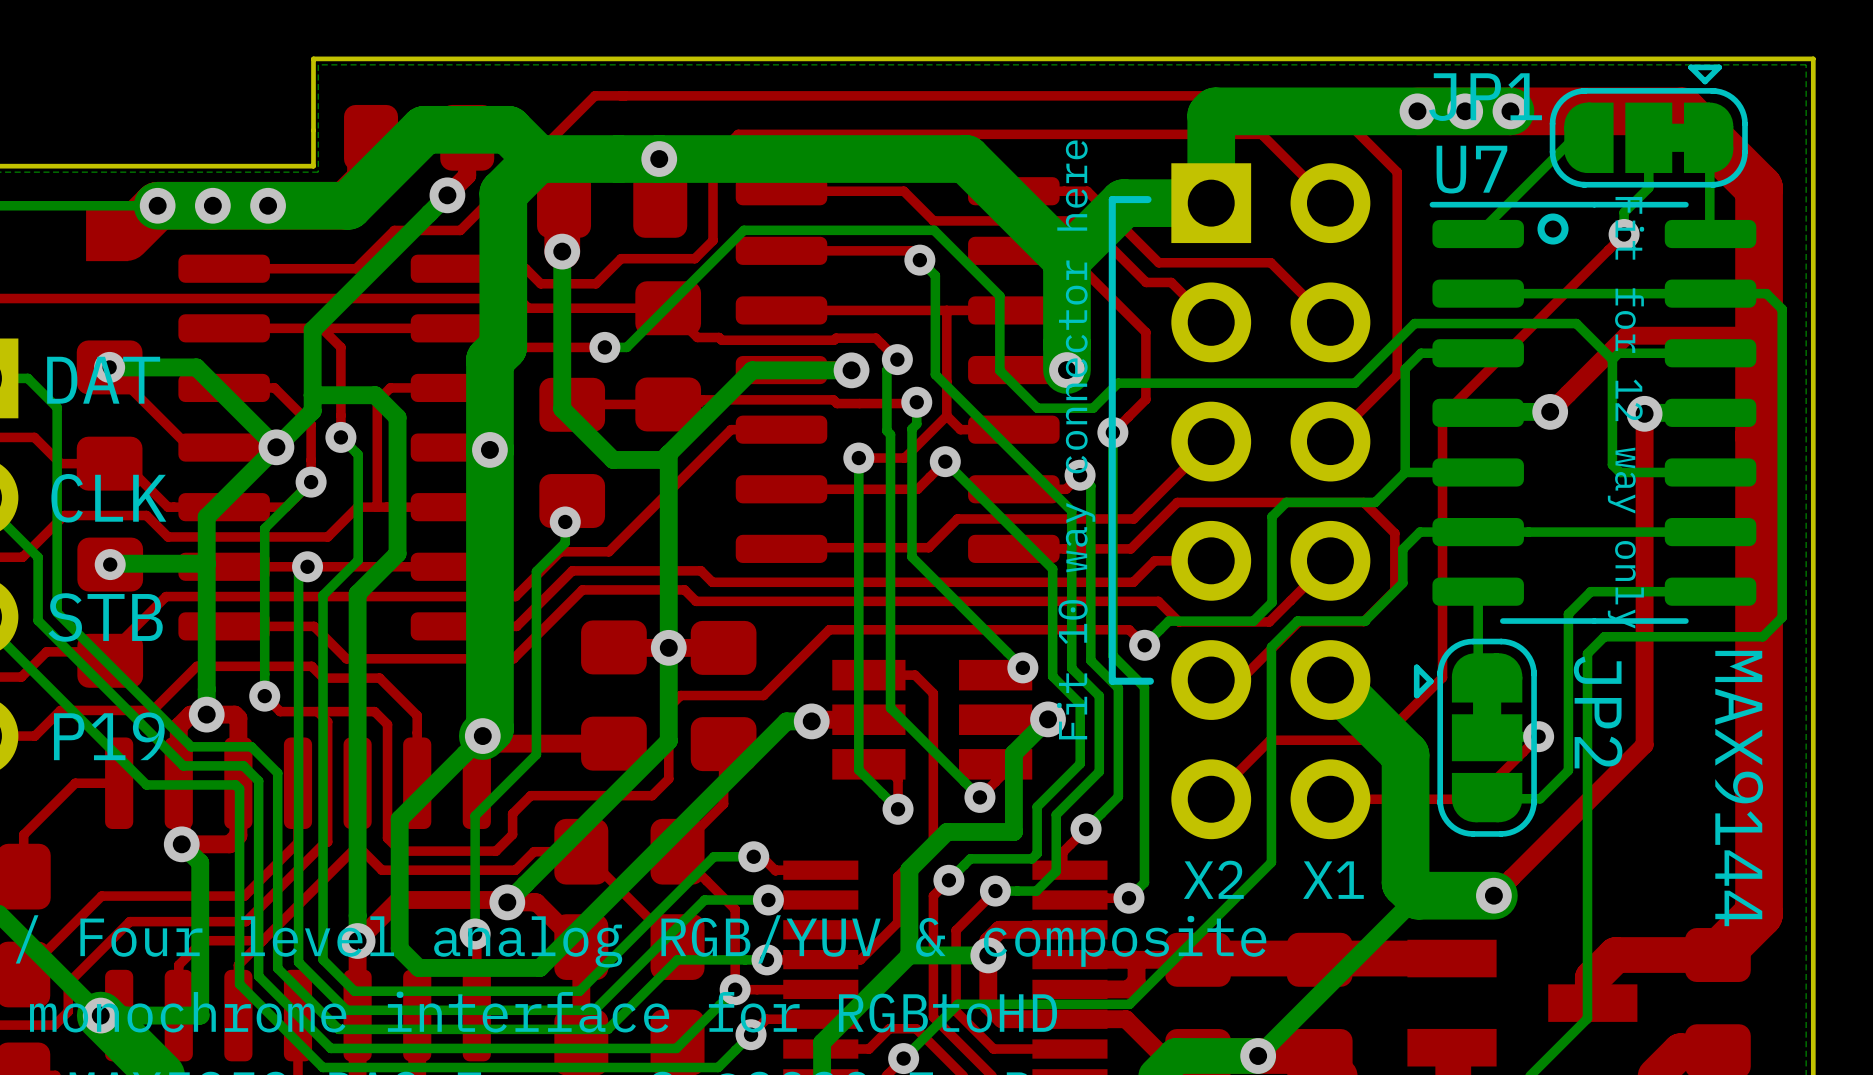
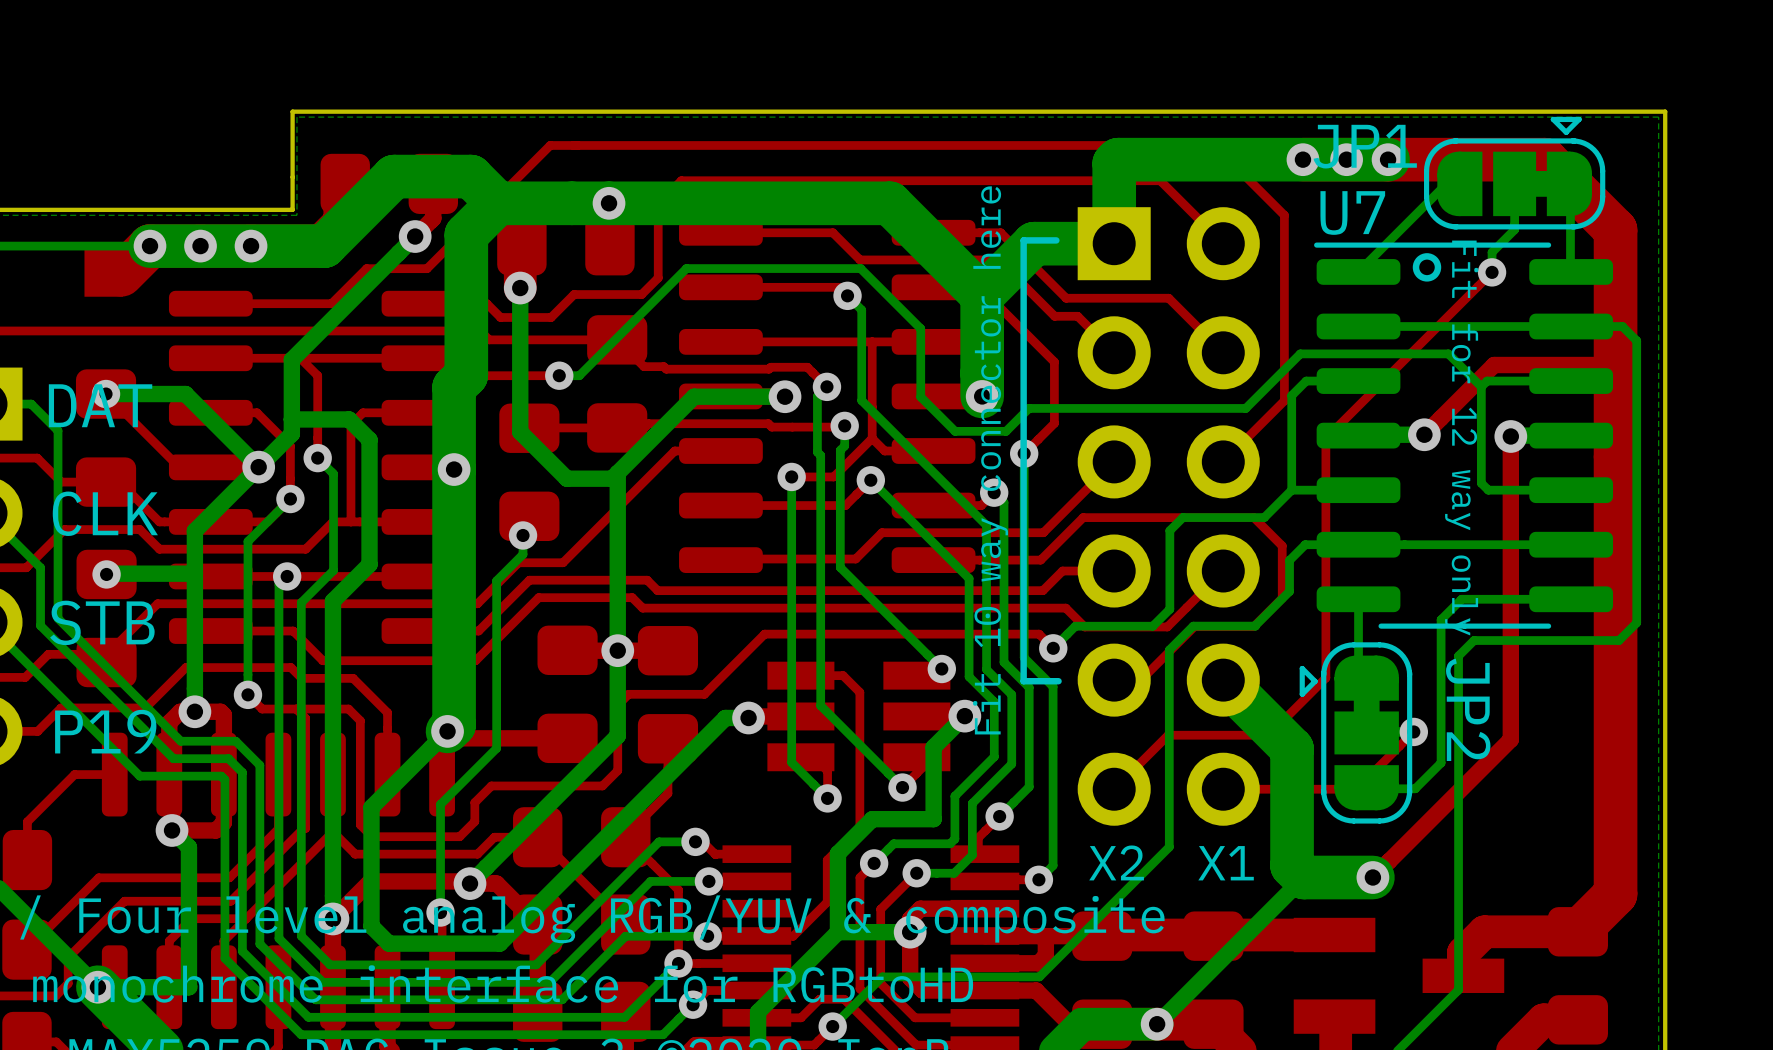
text position: Fit for 12 way only (1626, 412) -> Fit for 12 way only (1461, 438)
U7 text: MAX9144 (1739, 788) -> none

